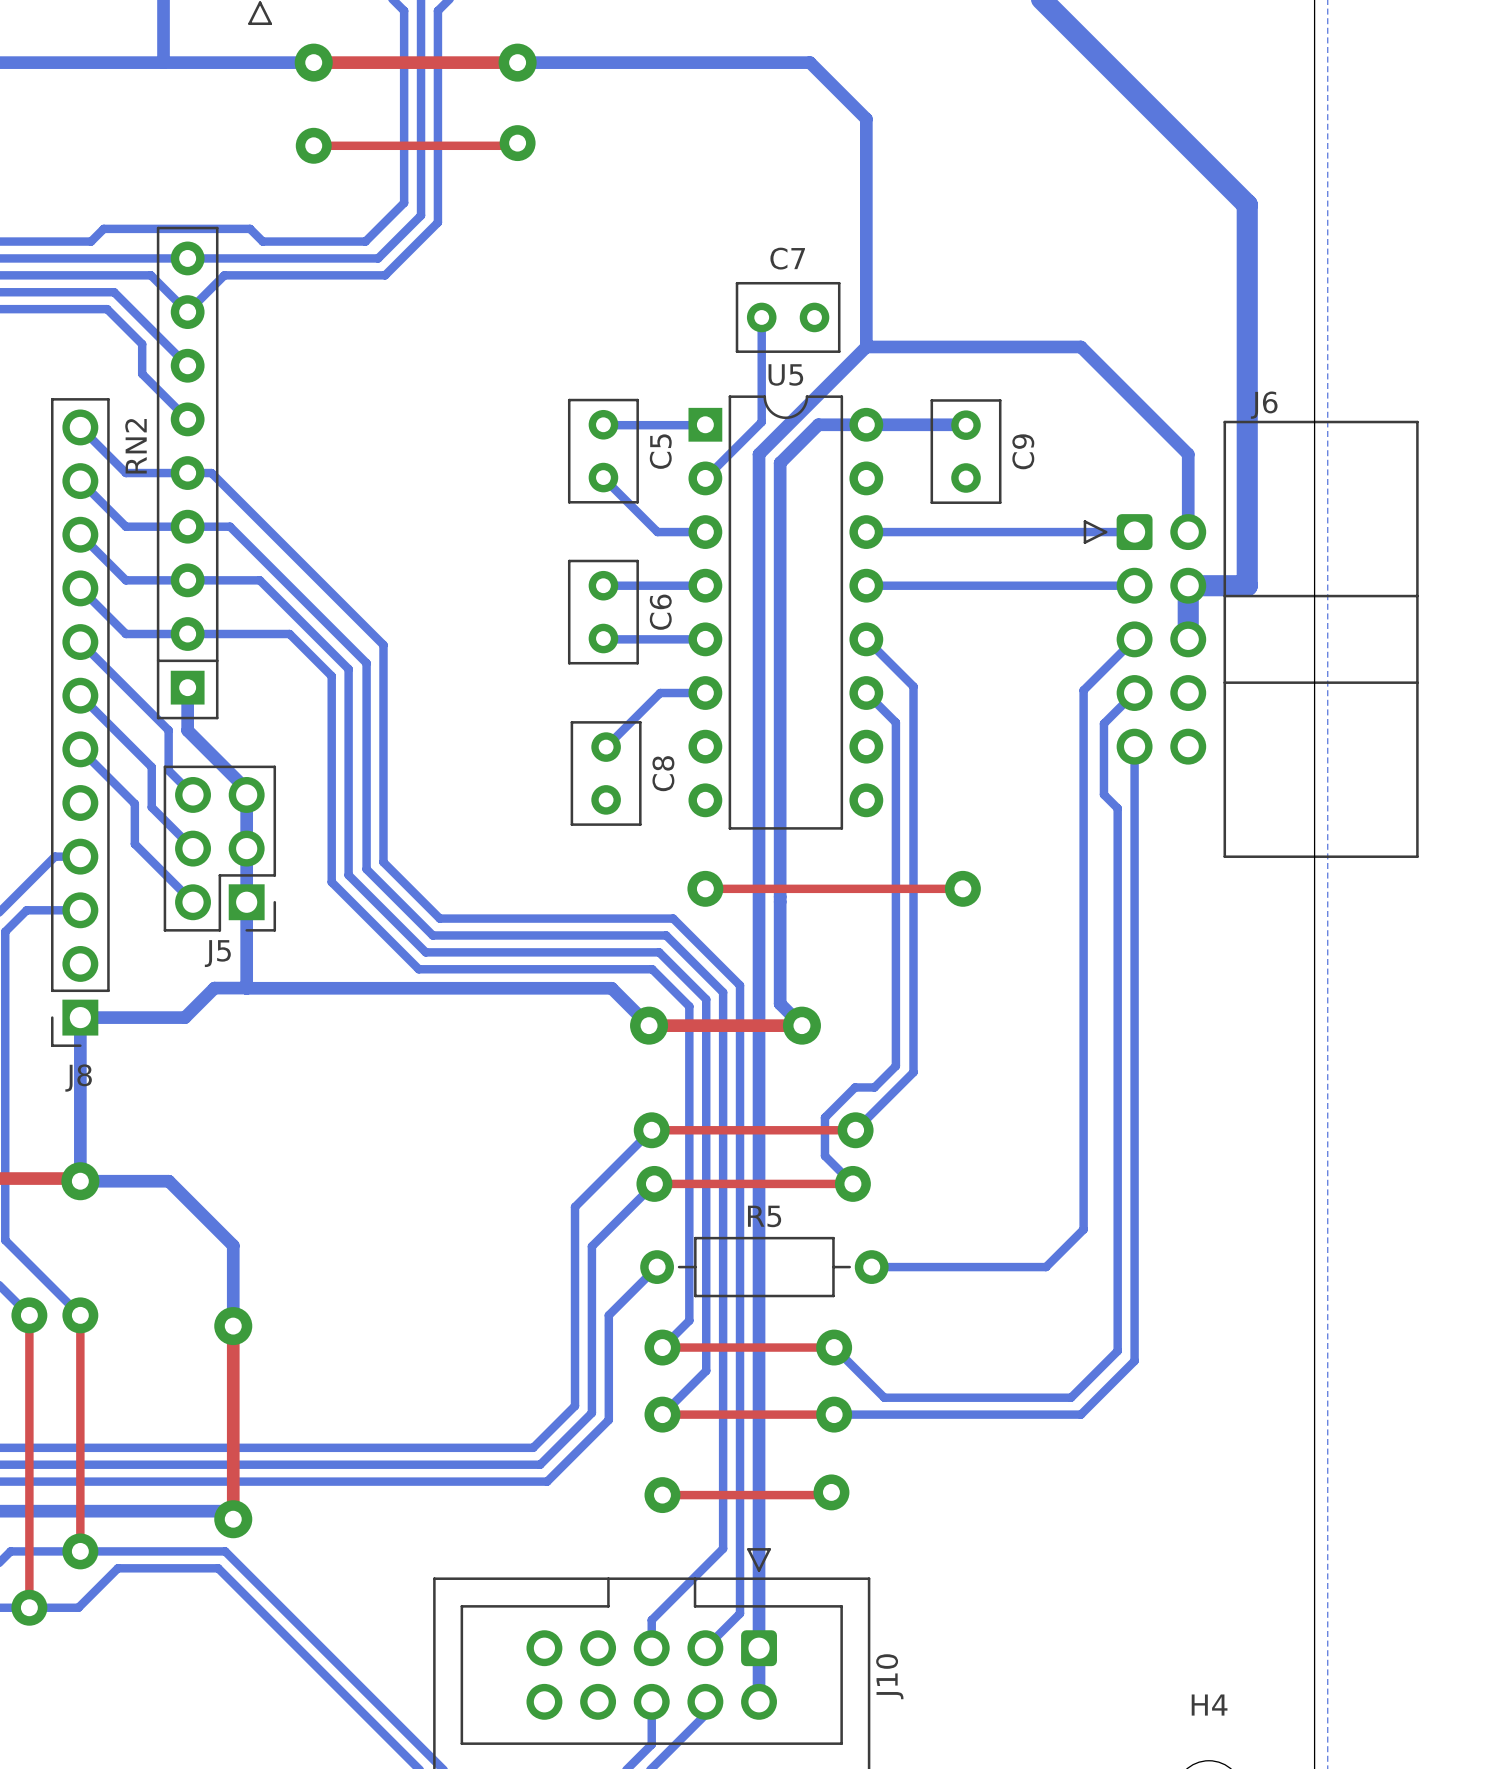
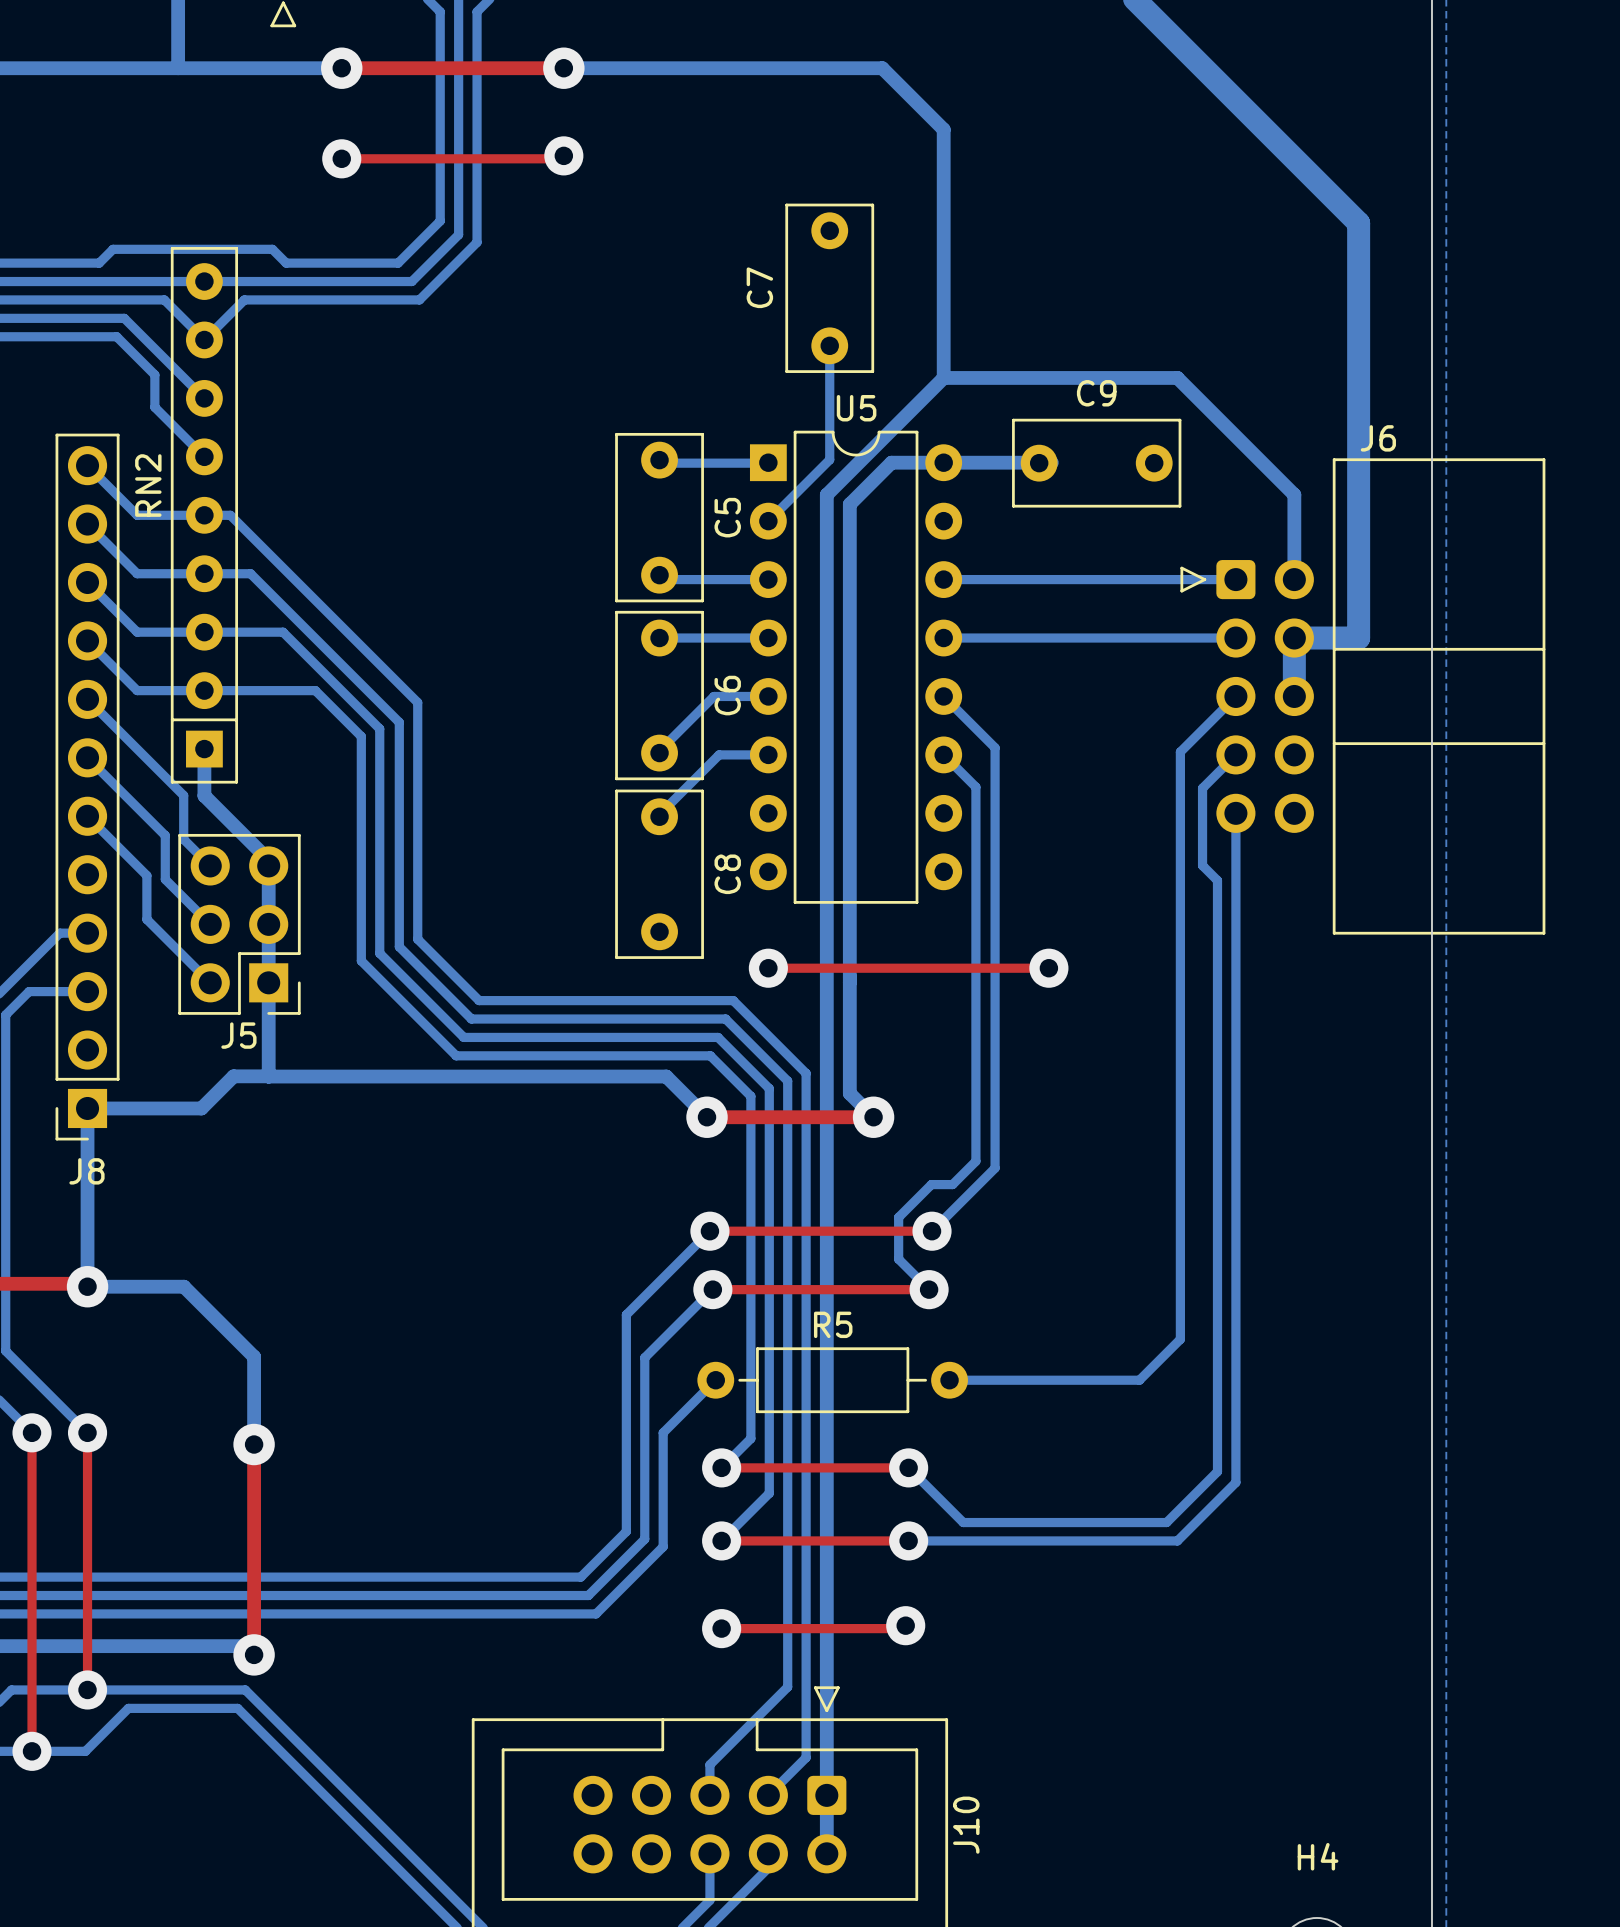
C7 name position: C7 (787, 258) -> C7 (759, 287)
C7 footprint: [735, 281, 841, 353] -> [785, 203, 875, 373]
C5 footprint: [567, 398, 639, 504] -> [615, 432, 704, 603]
C9 footprint: [930, 399, 1002, 504] -> [1012, 418, 1182, 508]
C9 name position: C9 (1023, 451) -> C9 (1096, 393)
bottom track: (603, 477) (657, 532) -> (657, 575) (661, 579) (716, 579)
C6 footprint: [567, 559, 639, 665] -> [615, 610, 704, 781]
bottom track: (606, 639) (655, 639) -> (657, 753) (713, 696)
C8 footprint: [570, 721, 642, 826] -> [615, 789, 704, 959]

